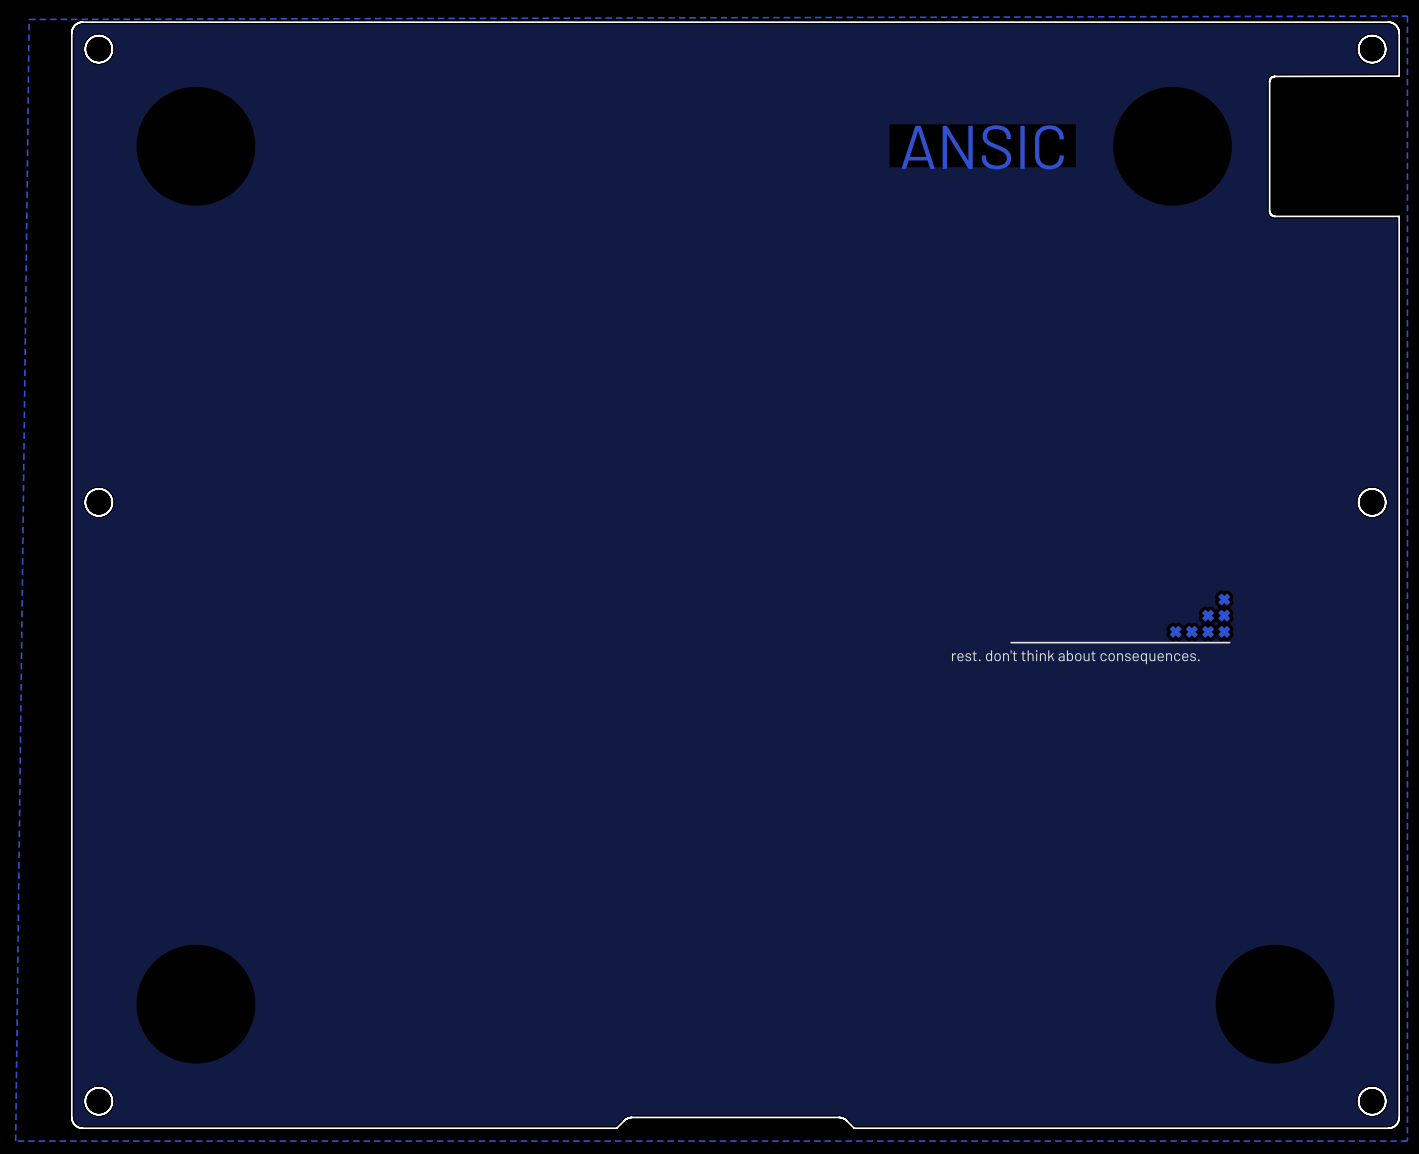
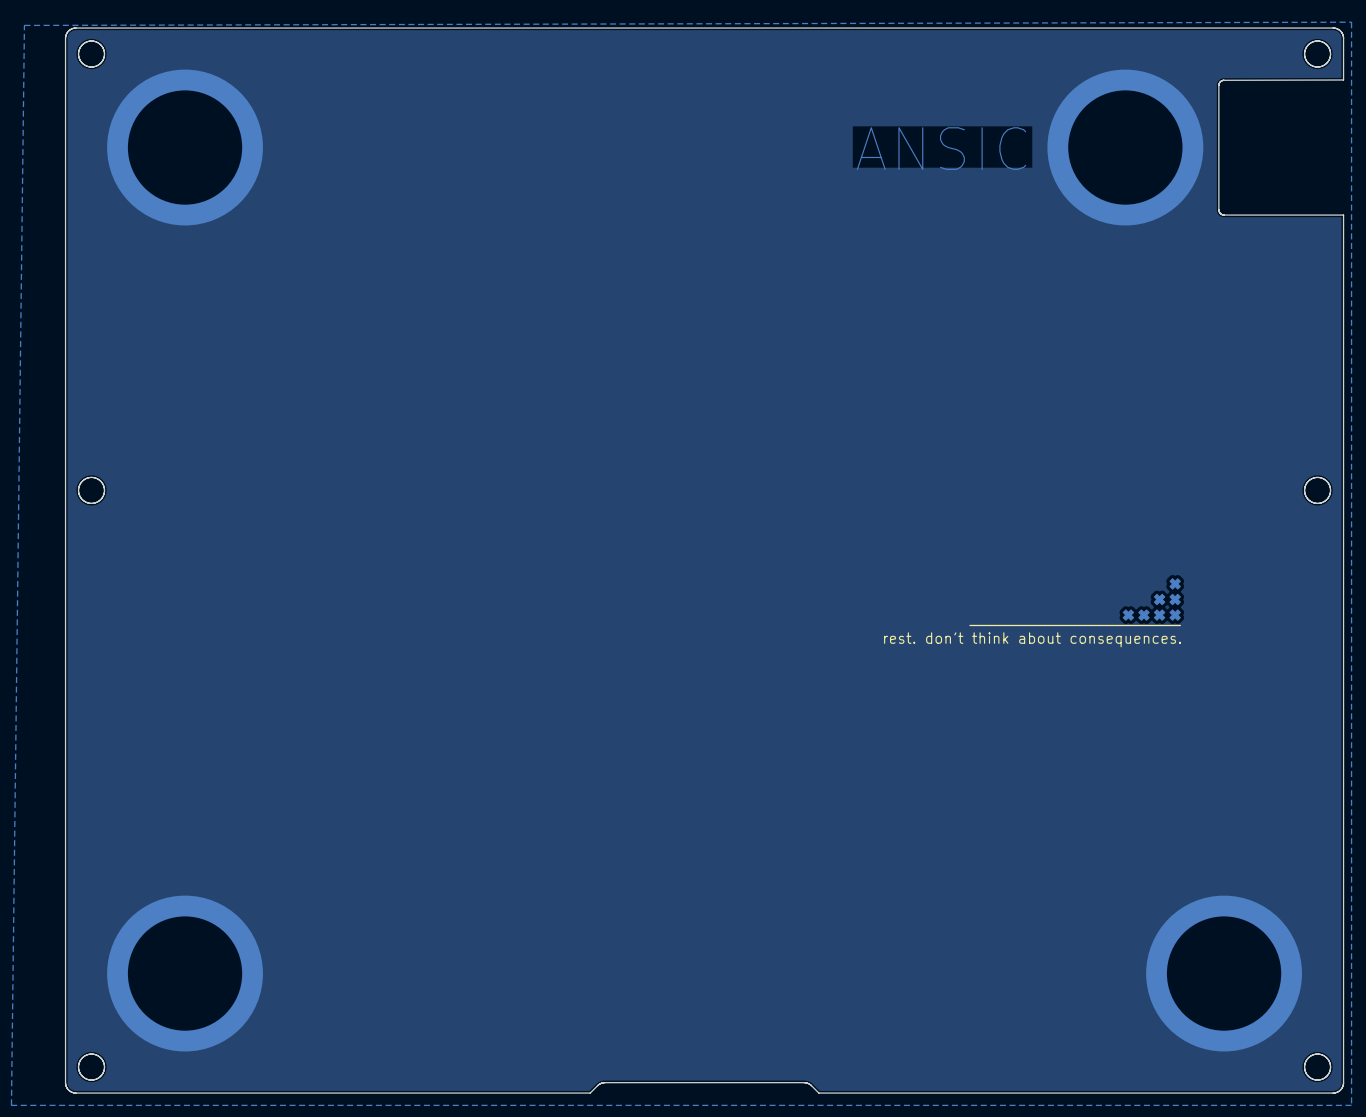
drawing: none -> [107, 69, 263, 226]
drawing: none -> [1047, 69, 1204, 226]
drawing: none -> [107, 895, 263, 1052]
drawing: none -> [1146, 895, 1302, 1052]

